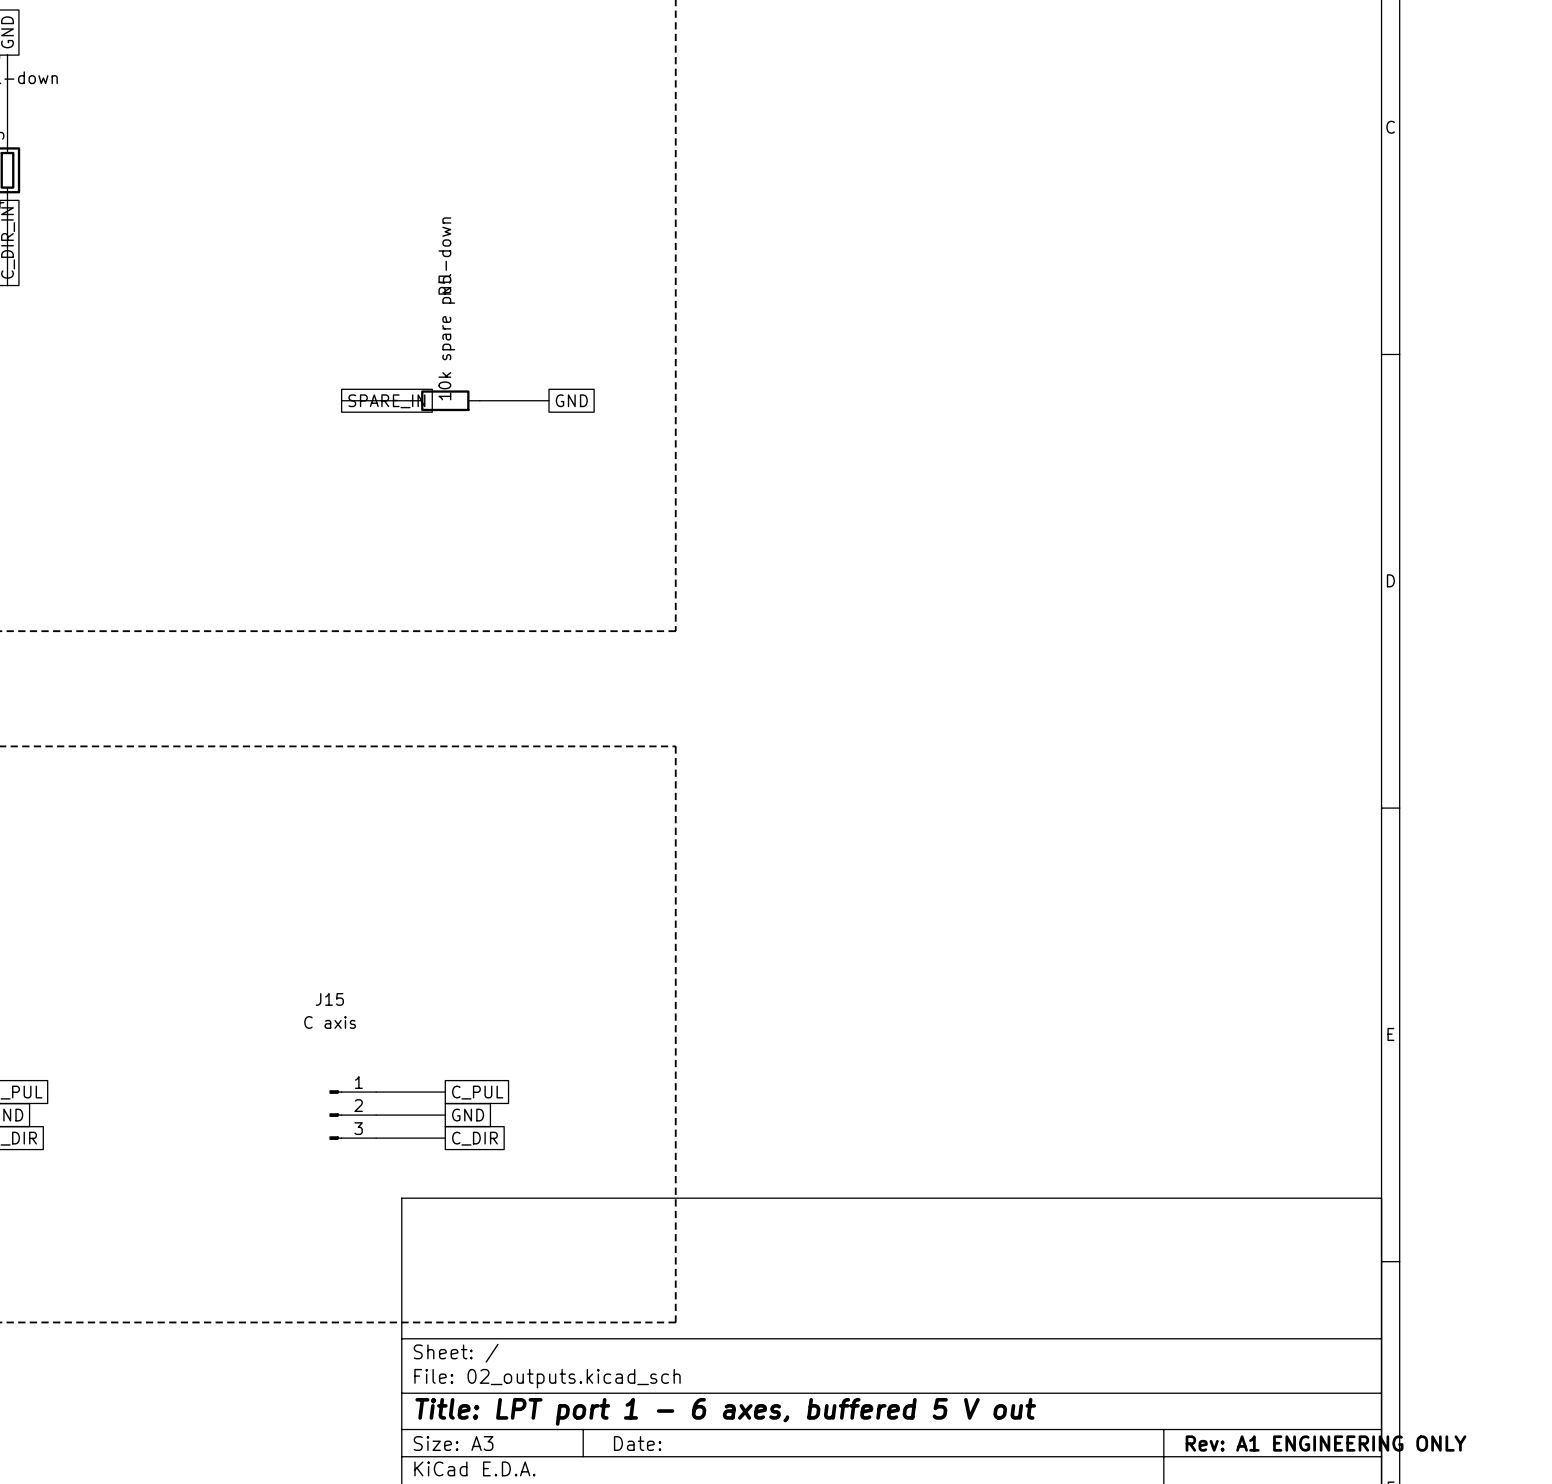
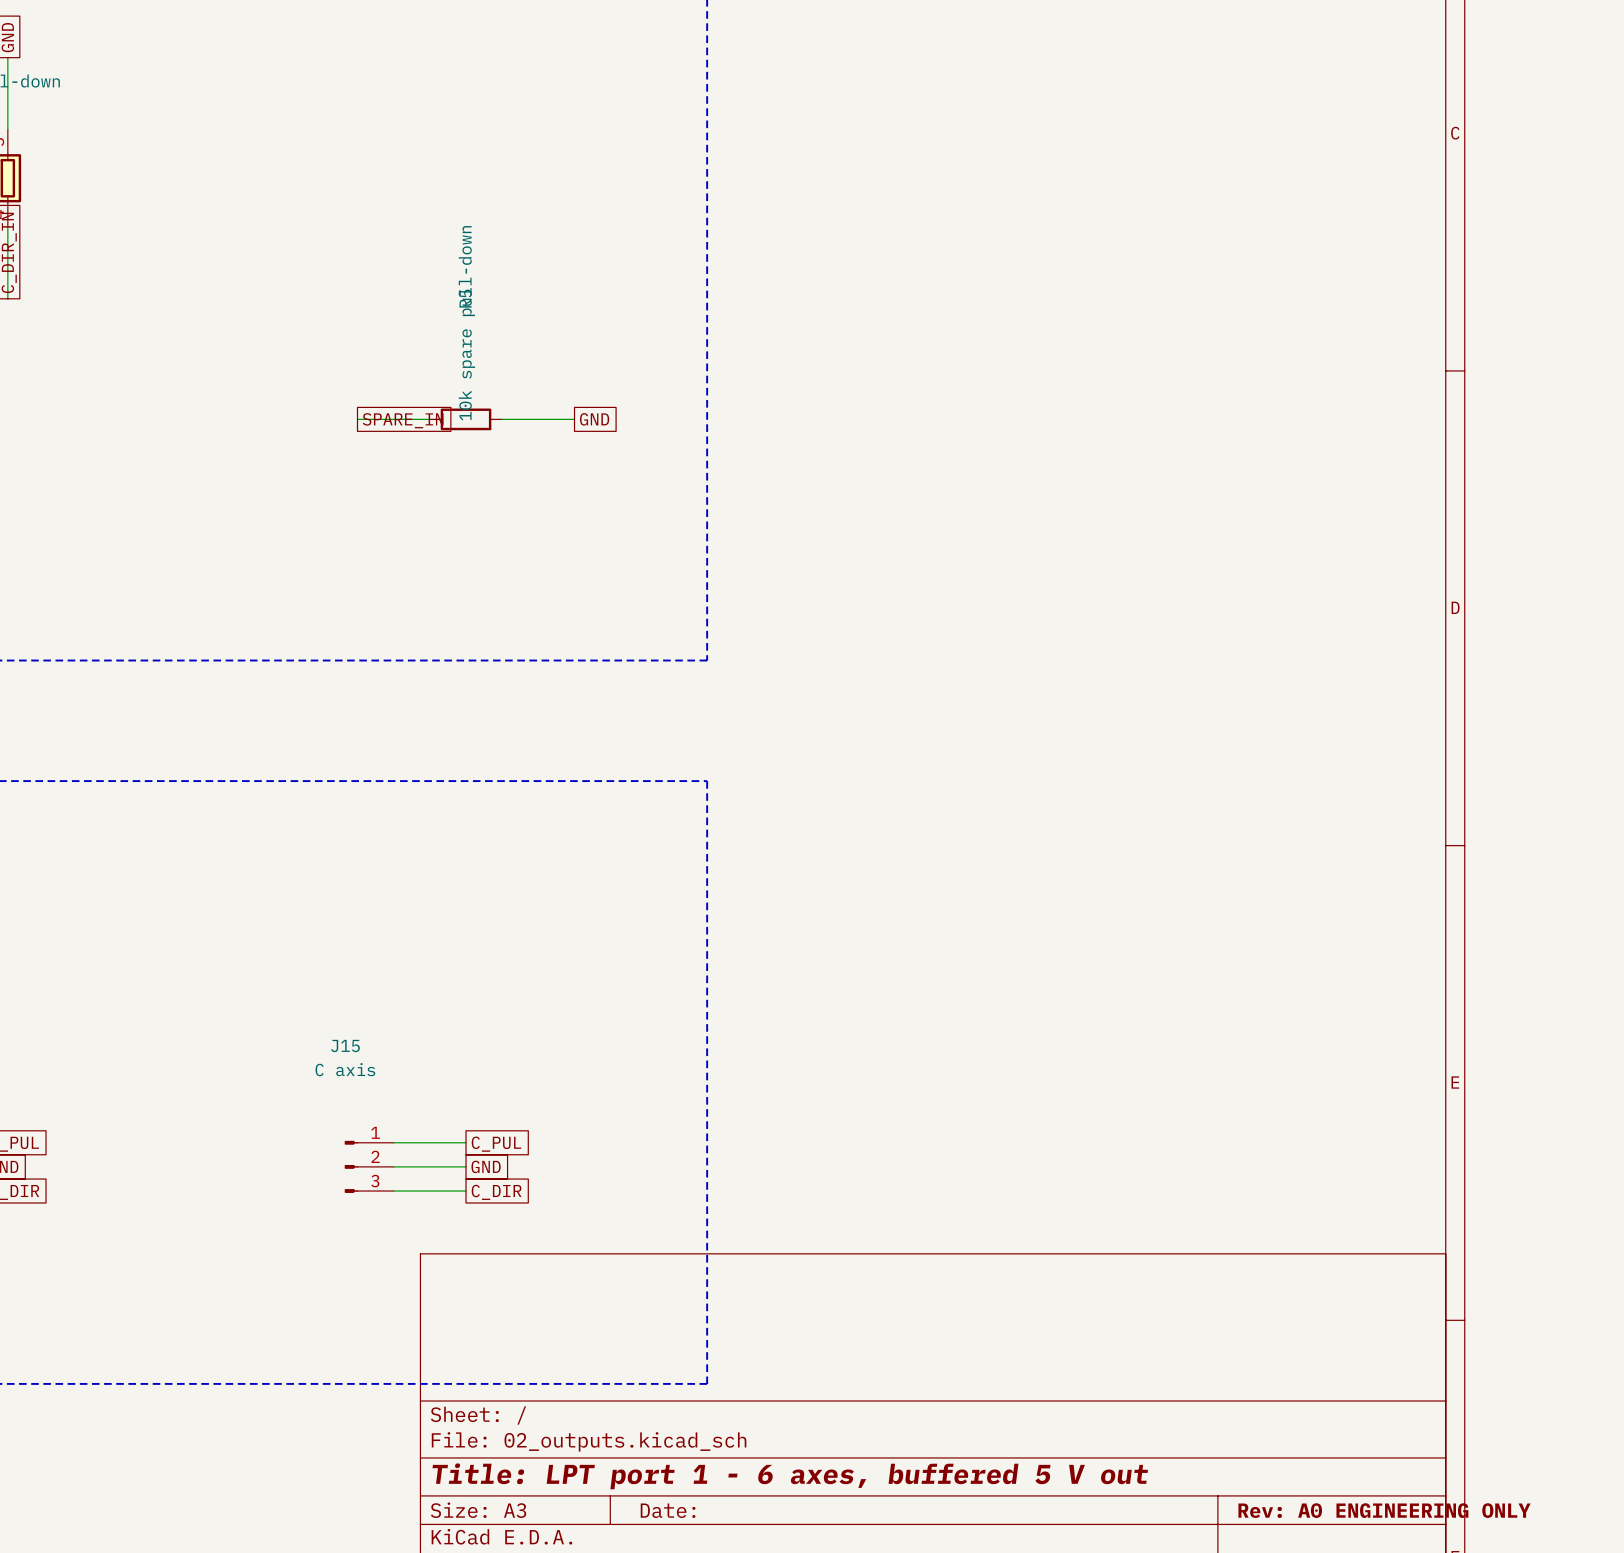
title block: Rev: A1 ENGINEERING ONLY (1325, 1443) -> Rev: A0 ENGINEERING ONLY (1384, 1510)

